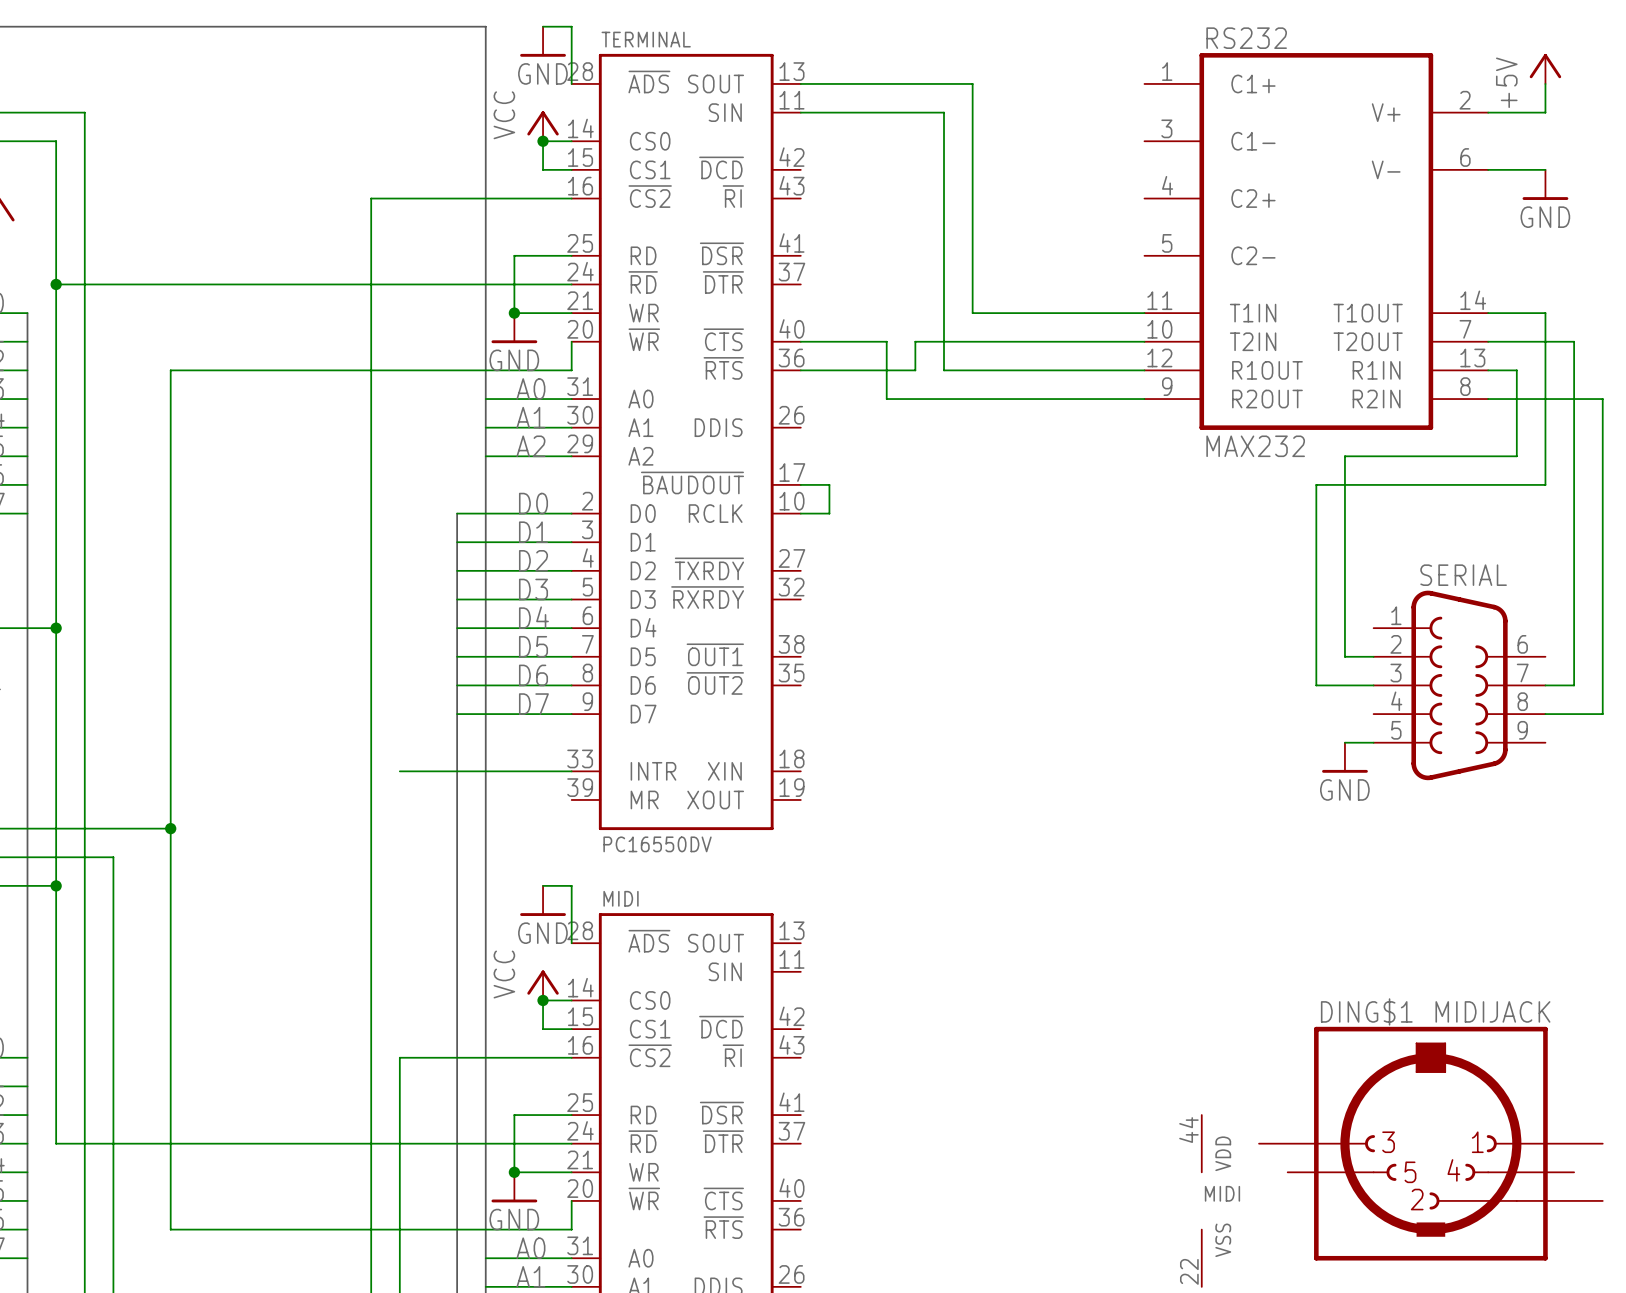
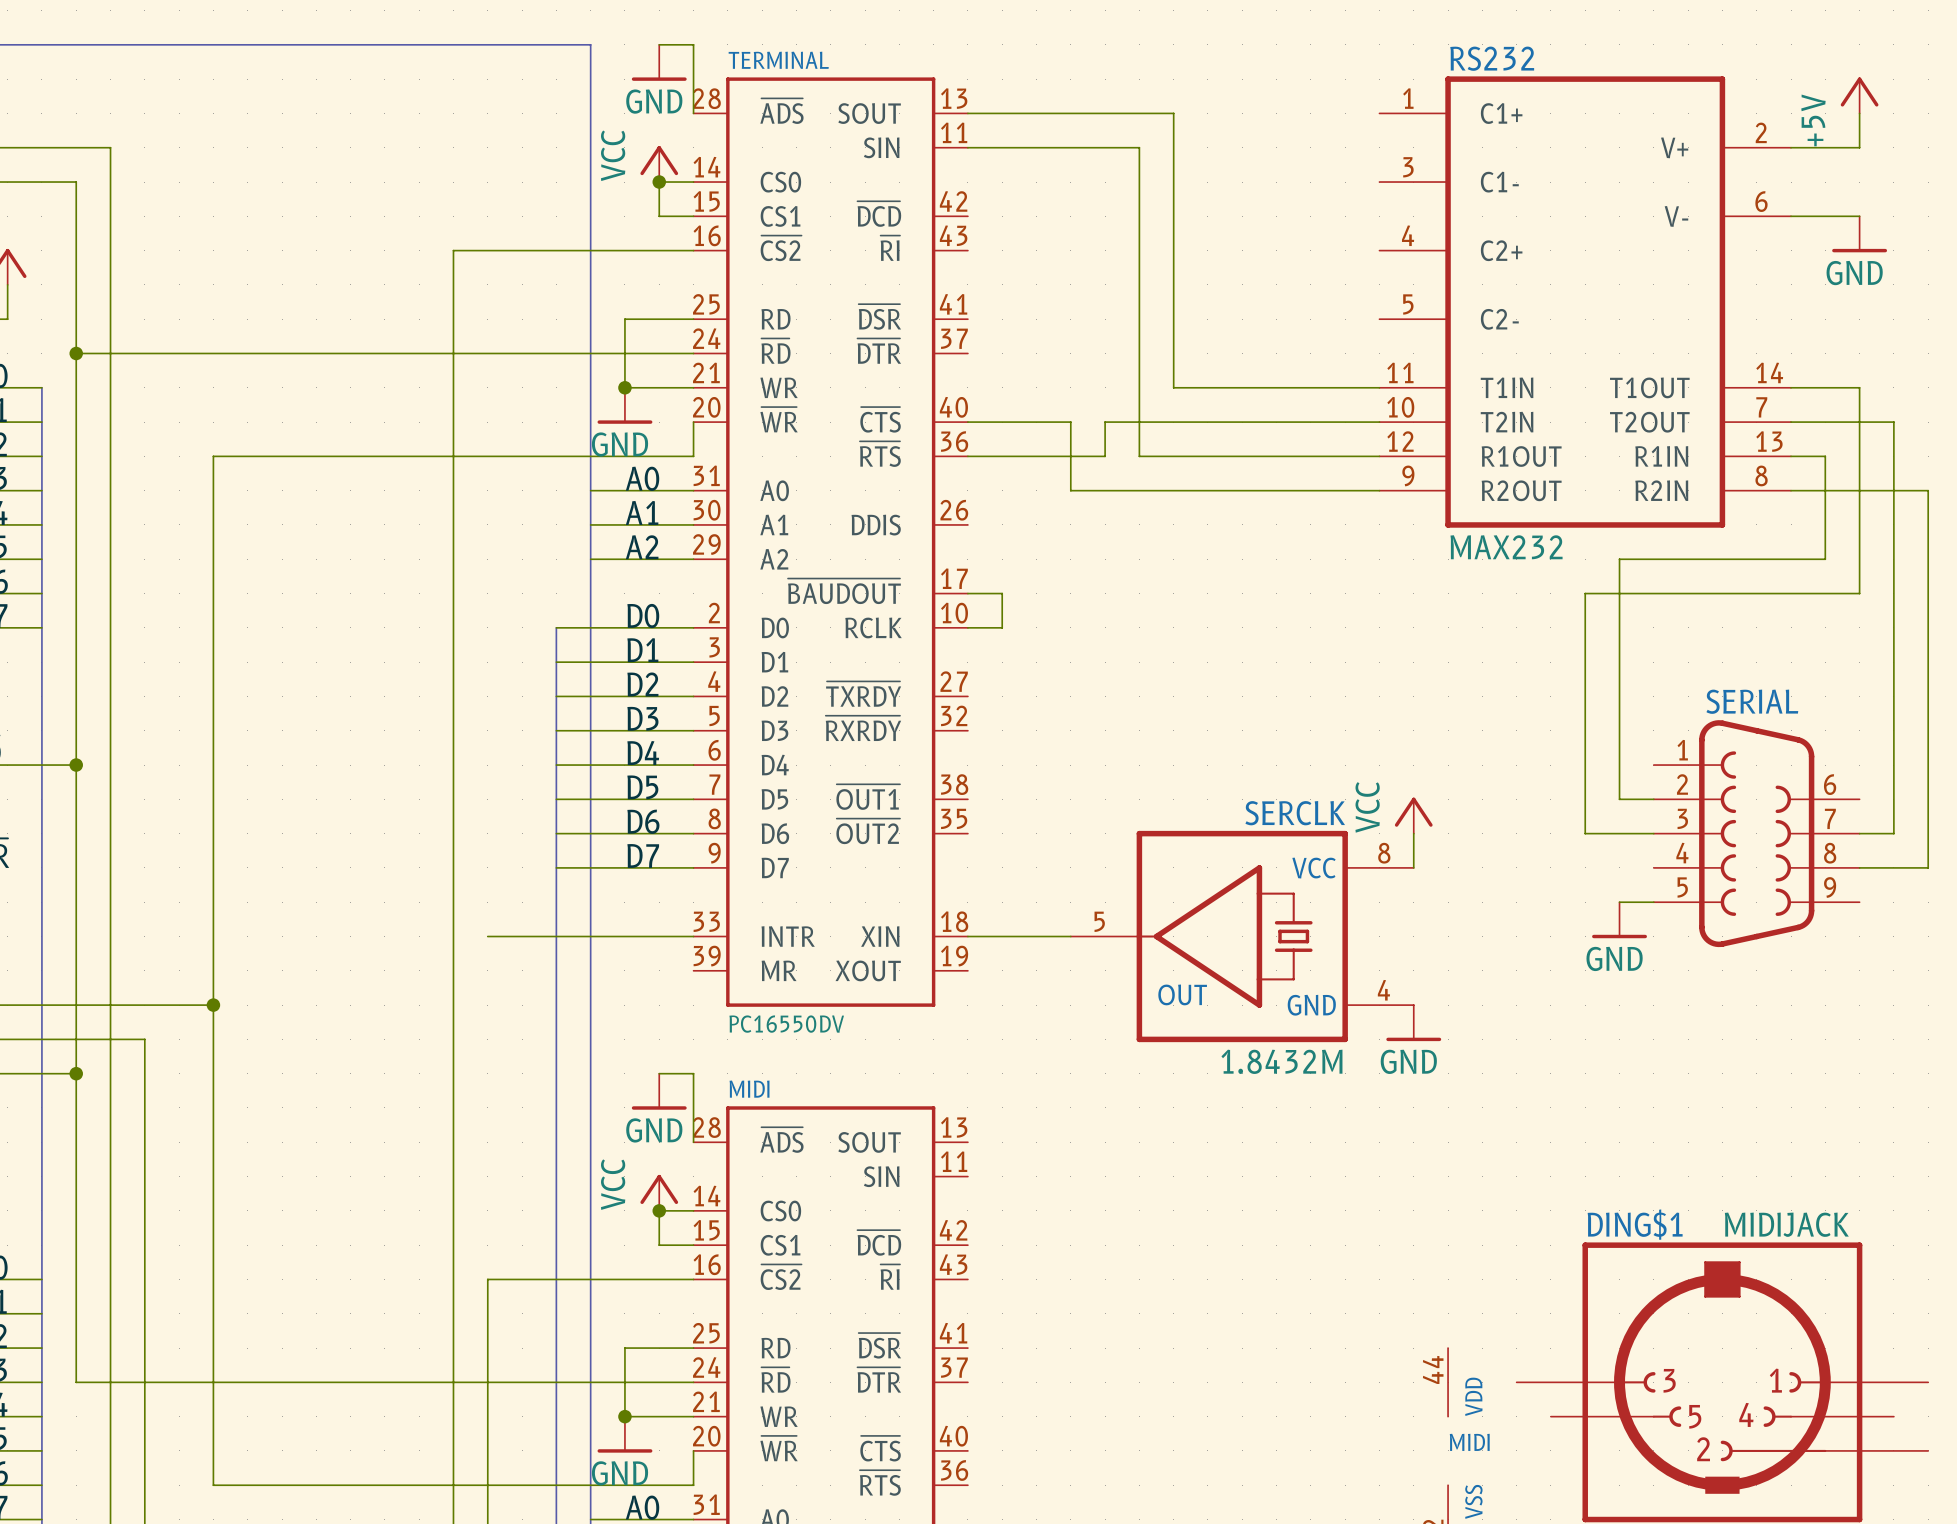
power symbol: none -> VCC (1413, 815)
wire: none -> (1413, 833) (1413, 867)
wire: none -> (967, 936) (1070, 936)
SERCLK: none -> 1.8432M (1242, 936)
power symbol: none -> GND (1413, 1023)

